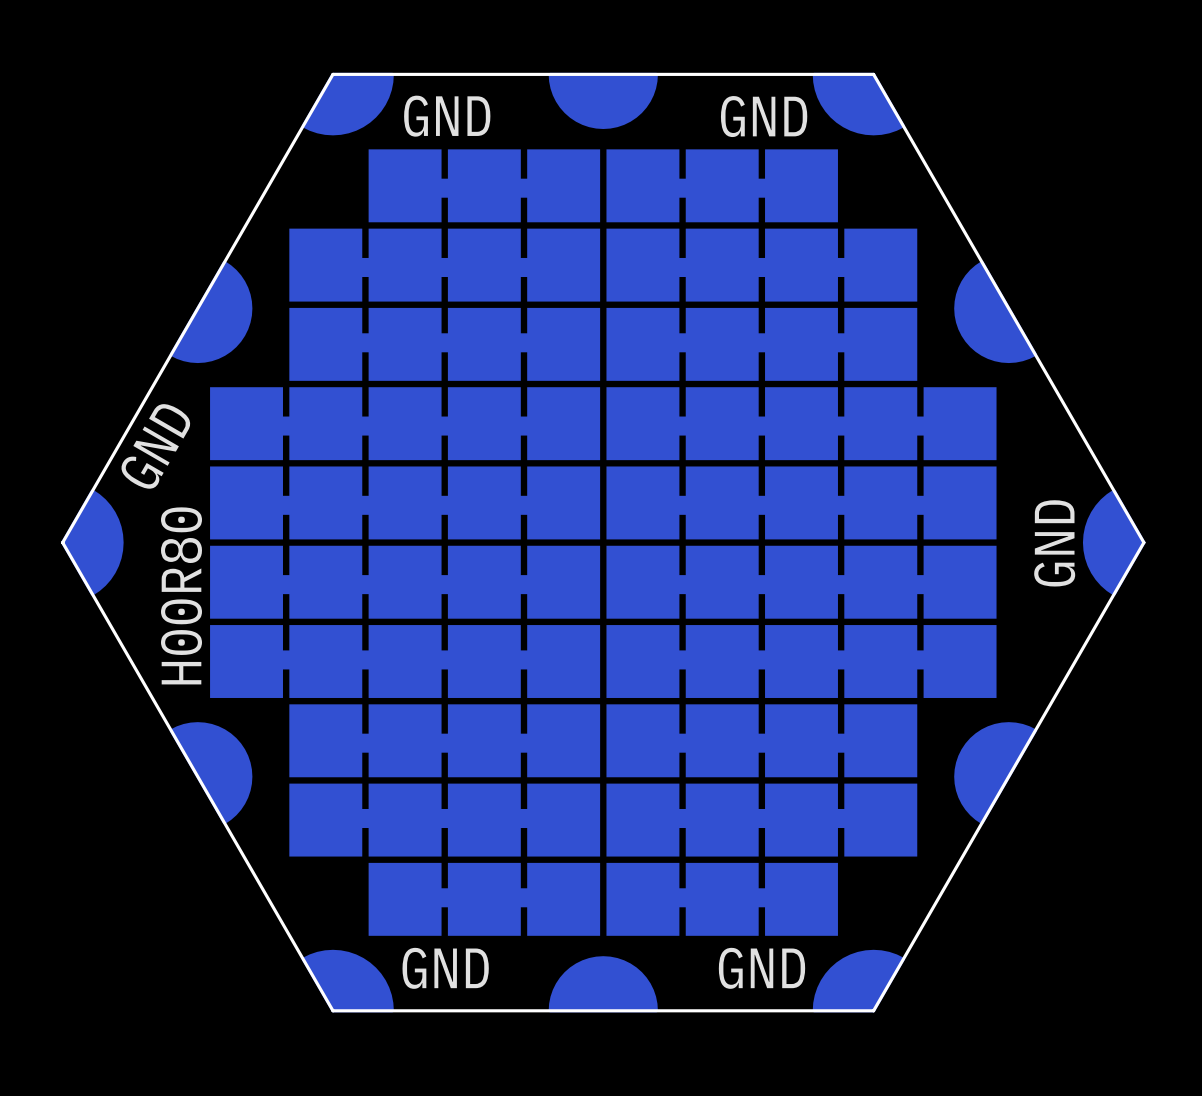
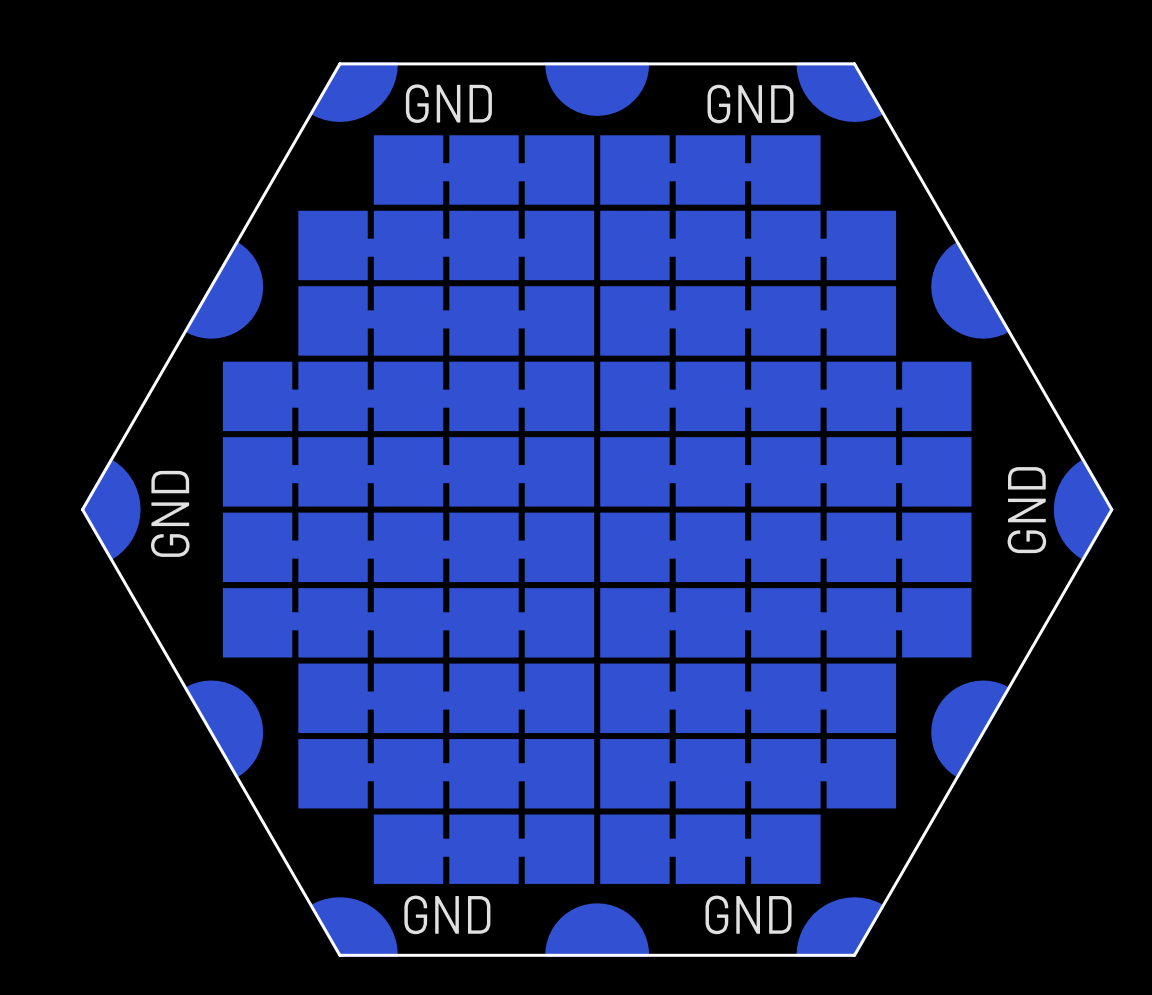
text rotation: 0° (155, 446) -> 30° counterclockwise (170, 513)
text: H00R80 (181, 595) -> none

